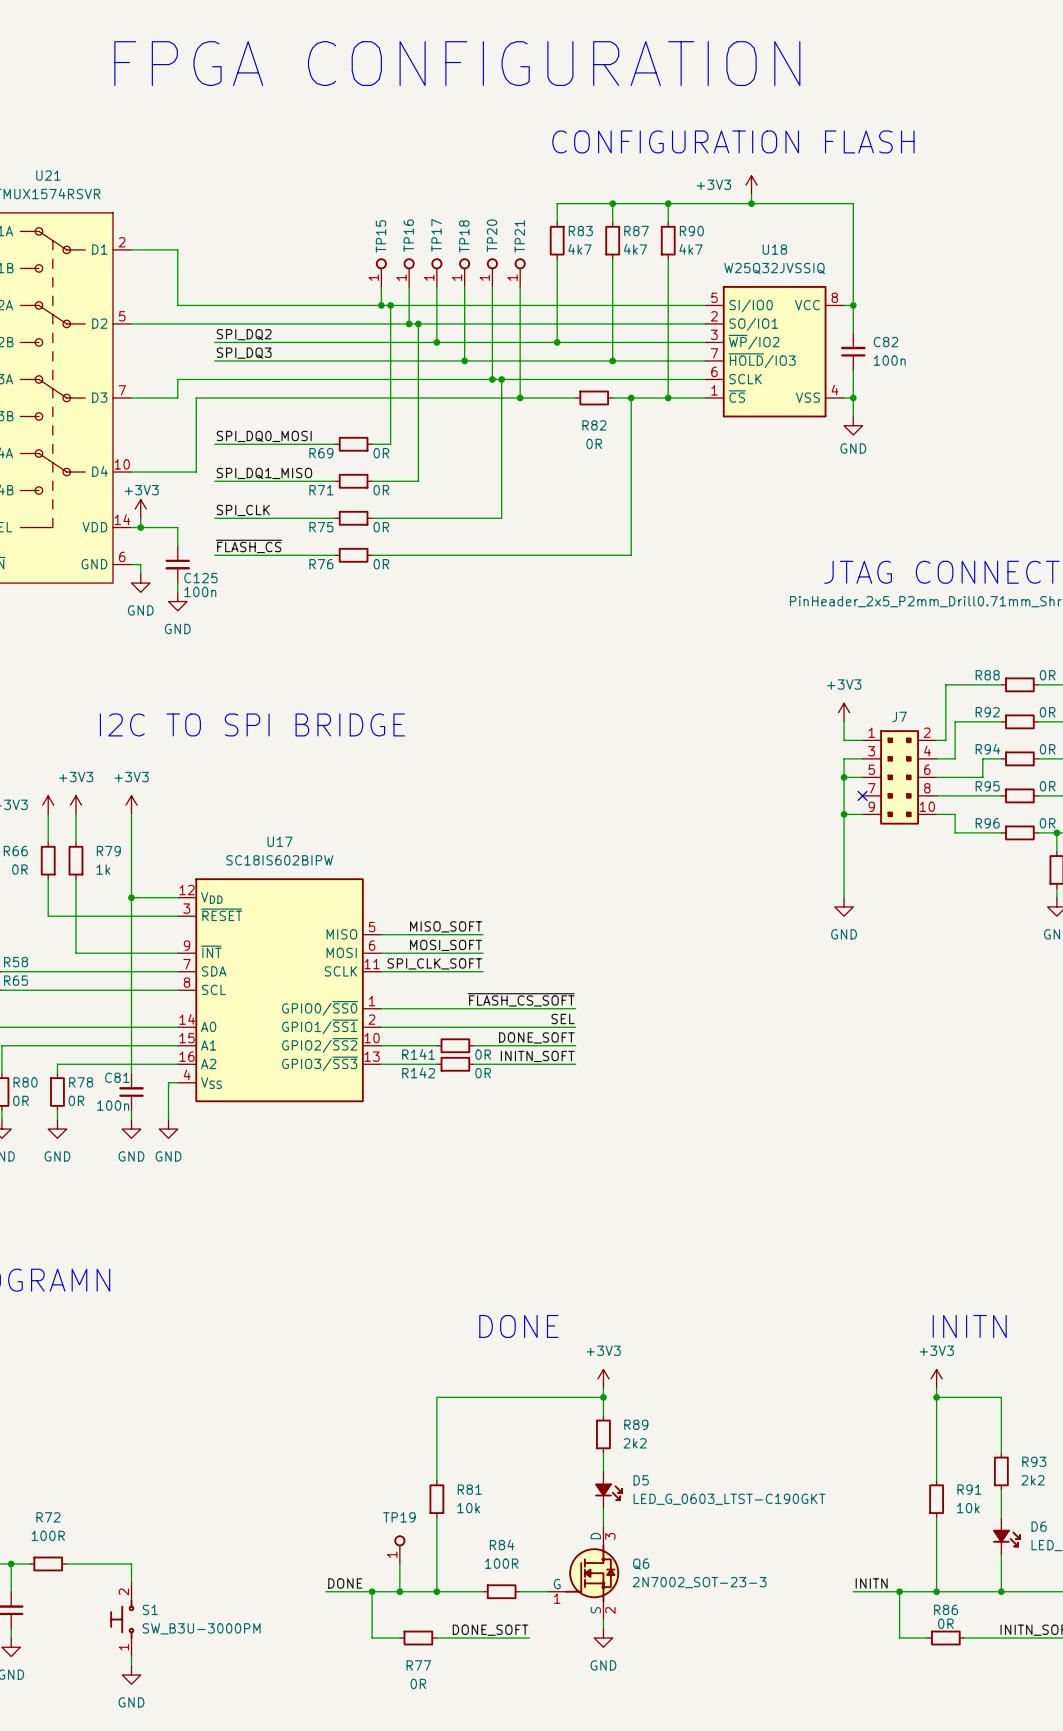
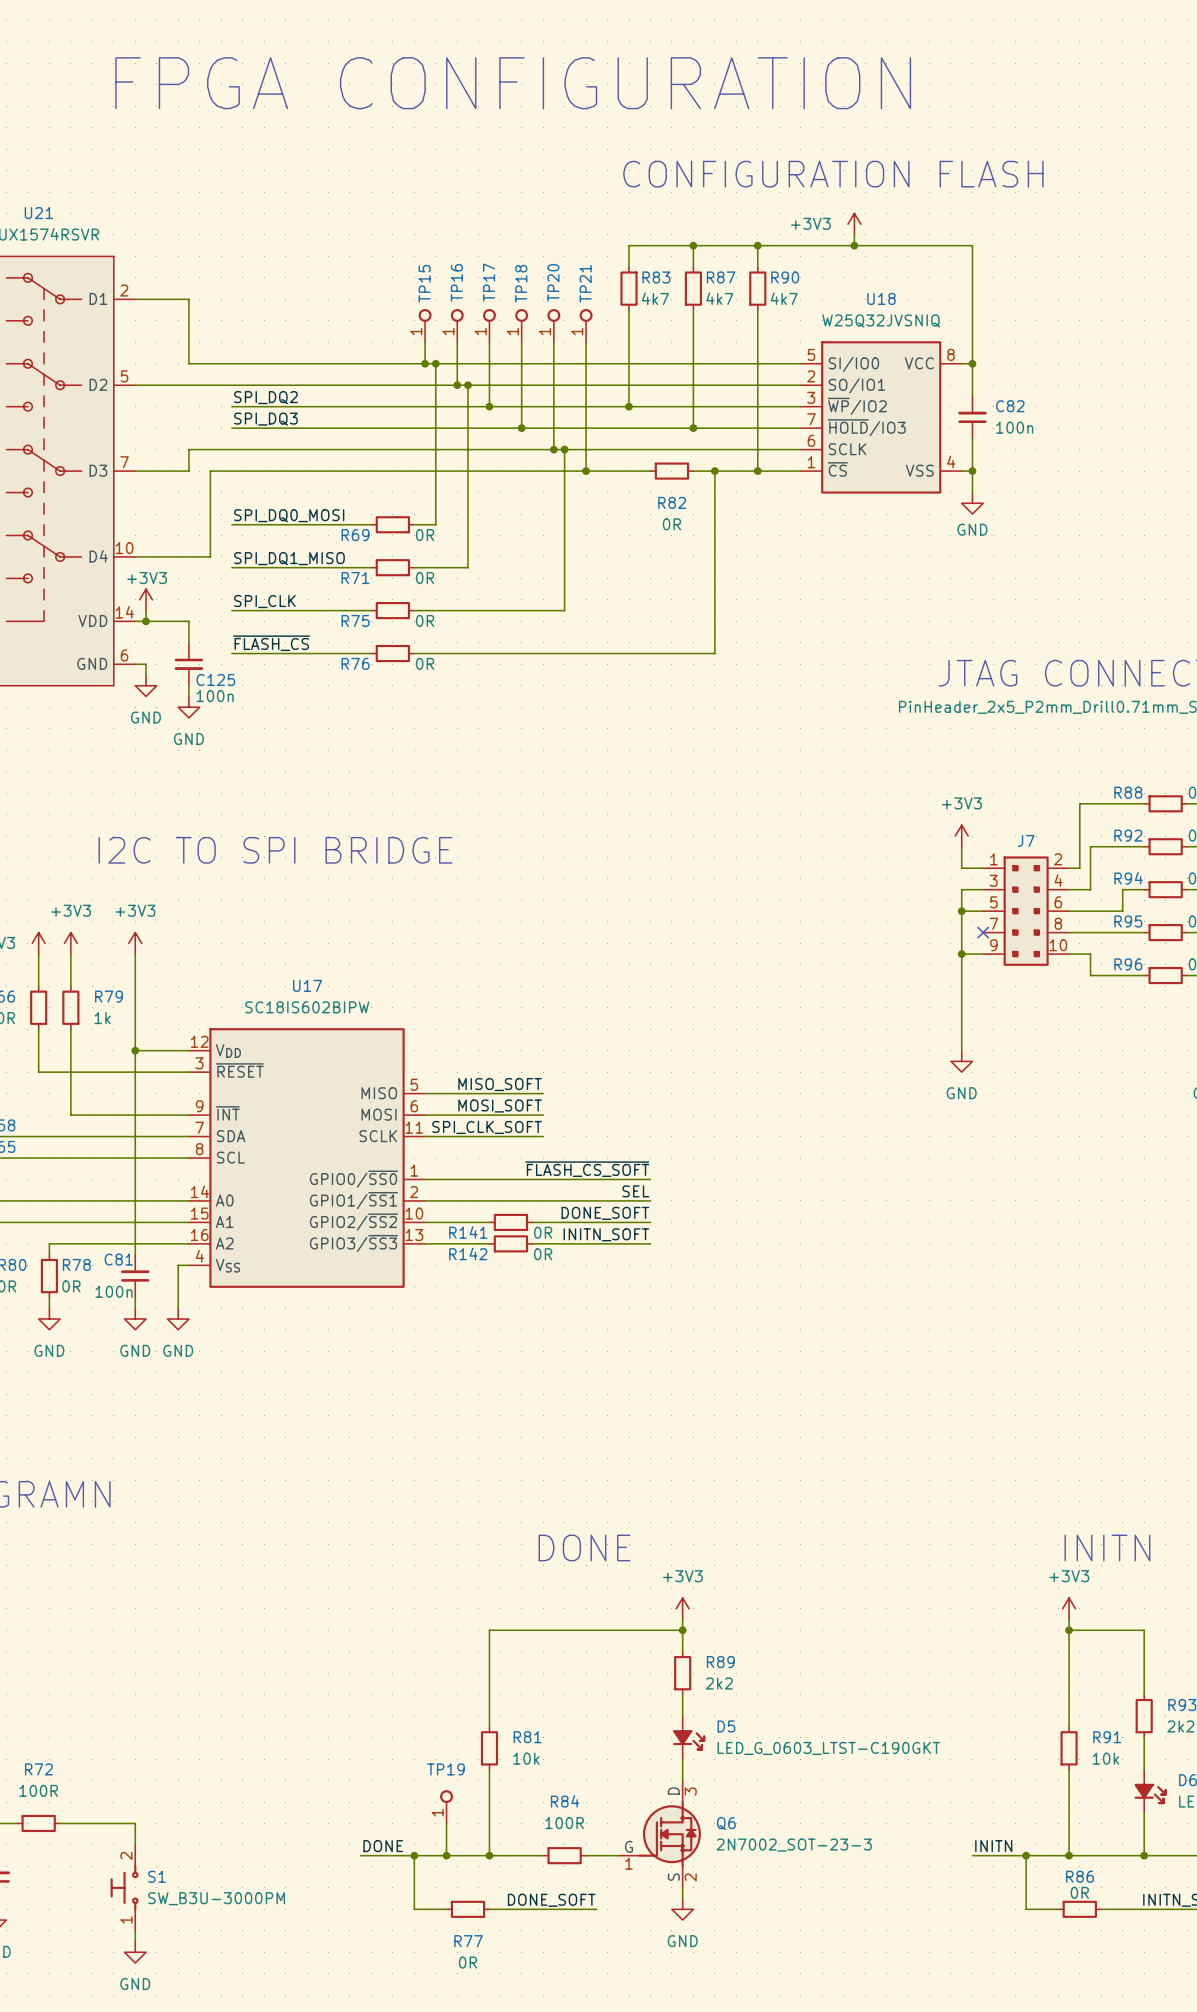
U18 text: none -> W25Q32JVSNIQ (881, 320)
U18 value: W25Q32JVSSIQ (774, 268) -> none

